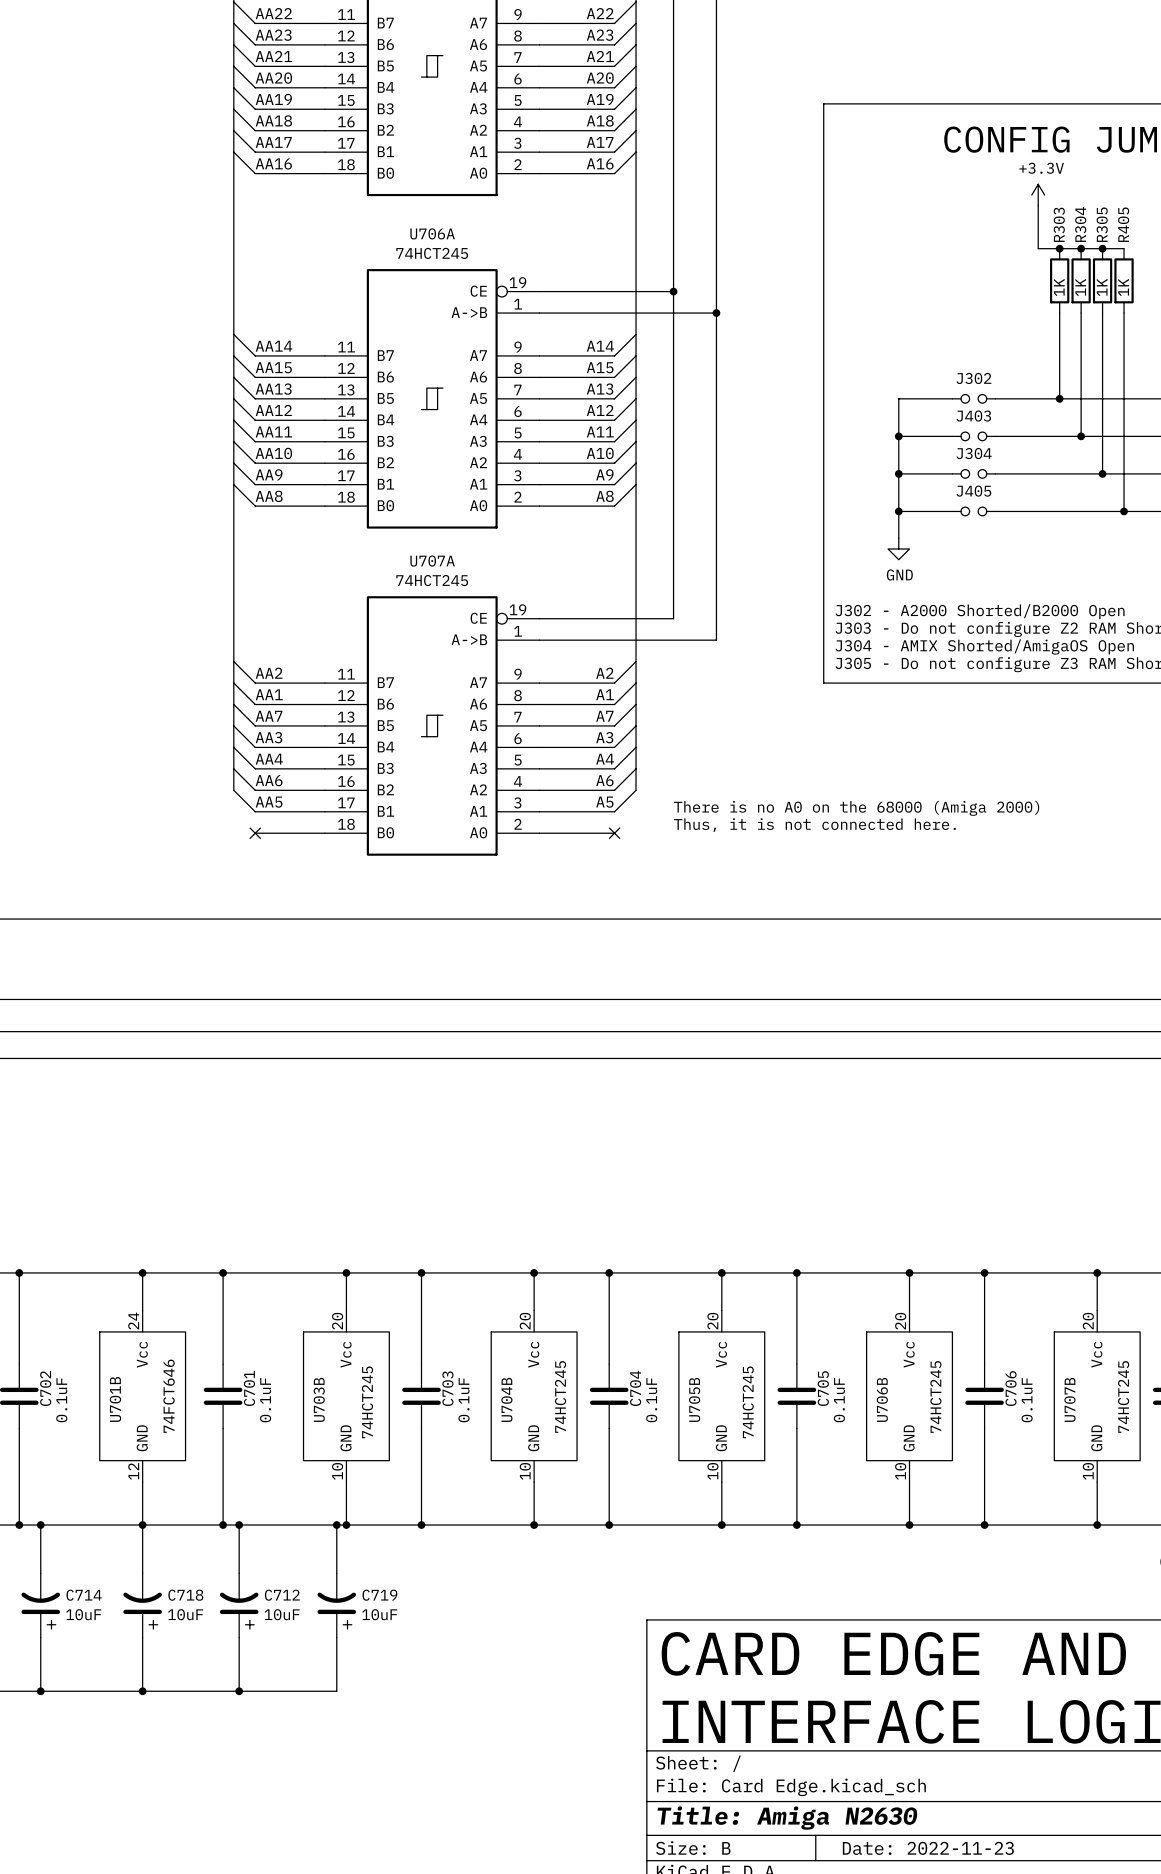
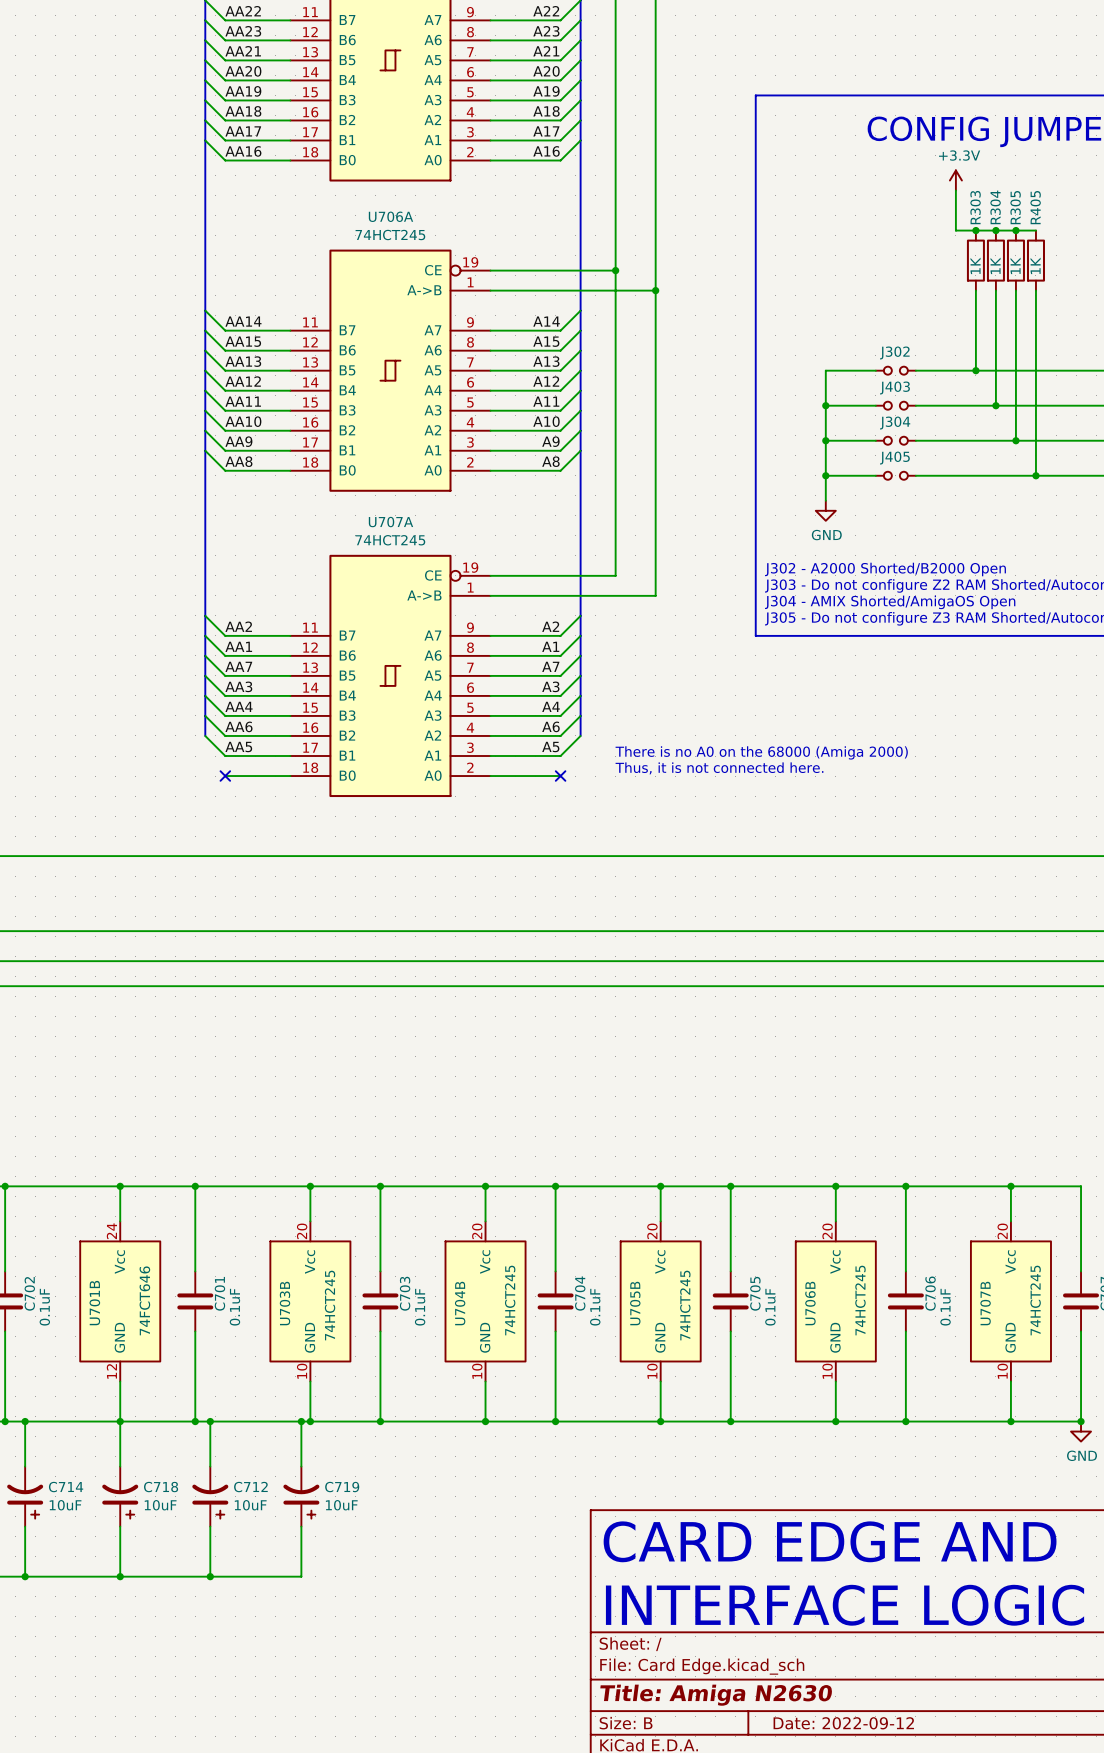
title block: Date: 2022-11-23 (928, 1848) -> Date: 2022-09-12 (843, 1723)

